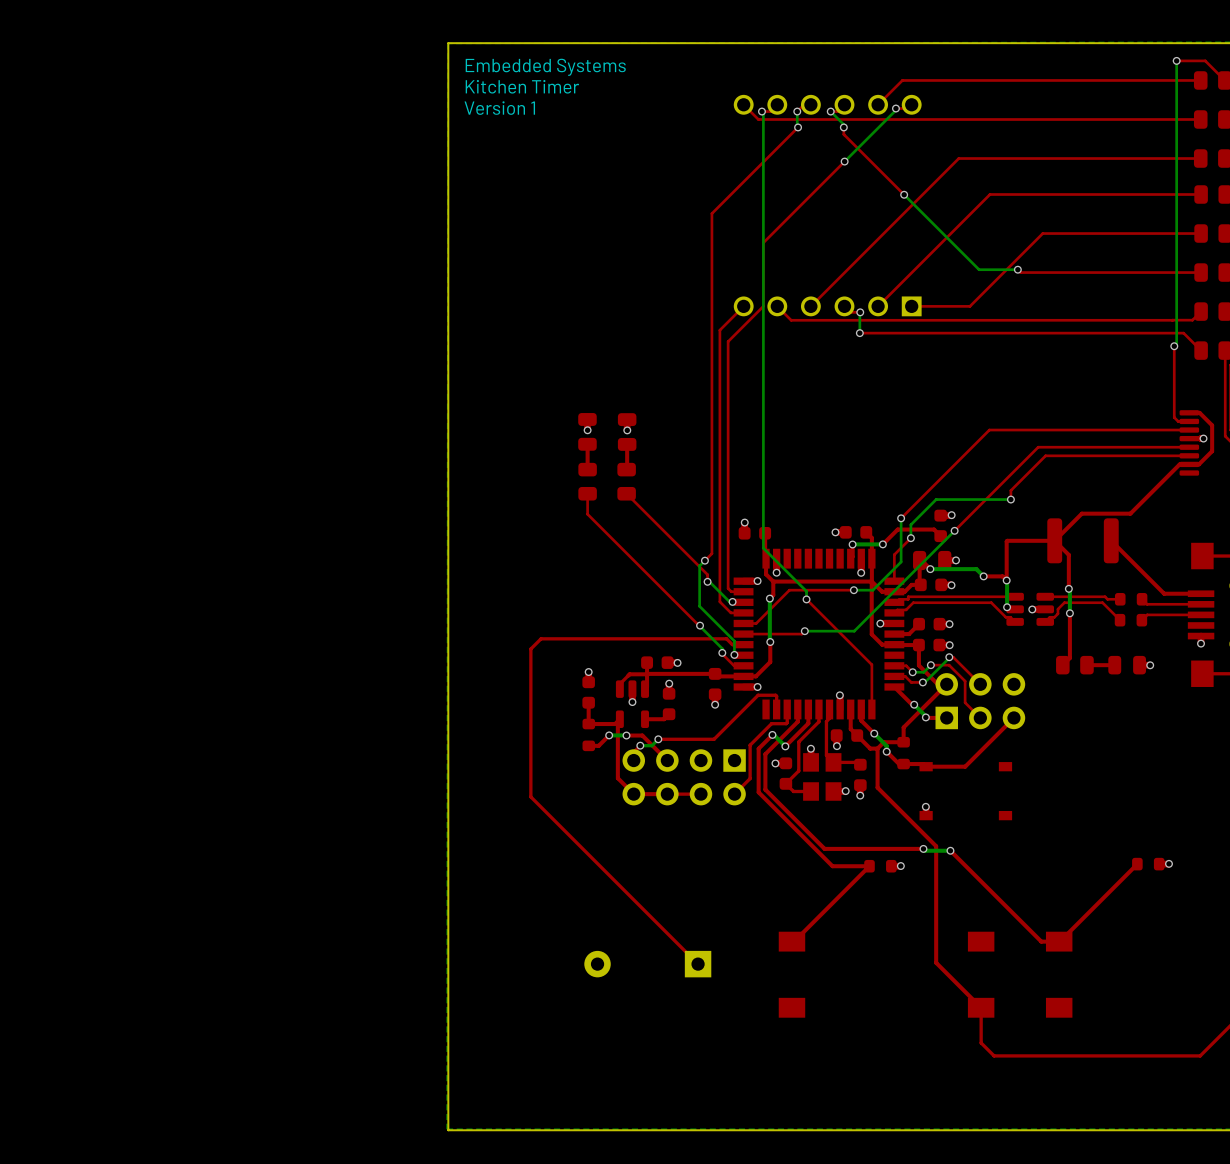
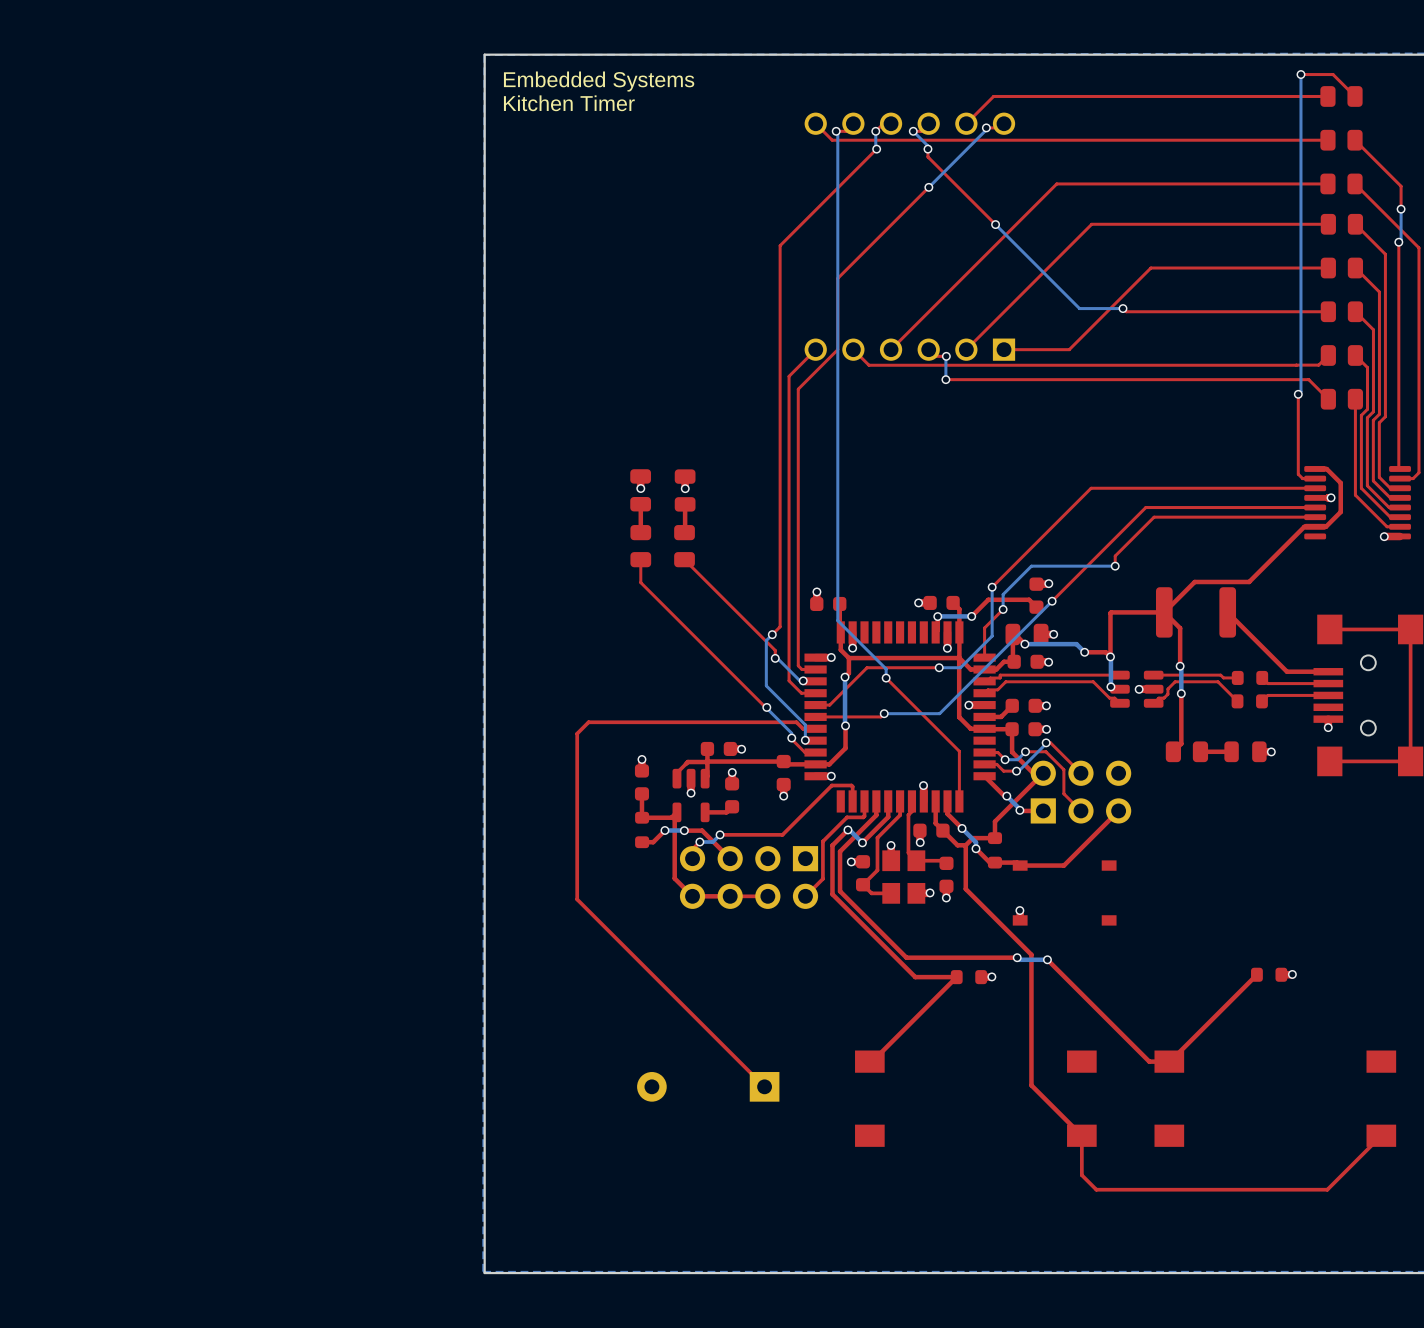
text: Version 1 (499, 108) -> none

